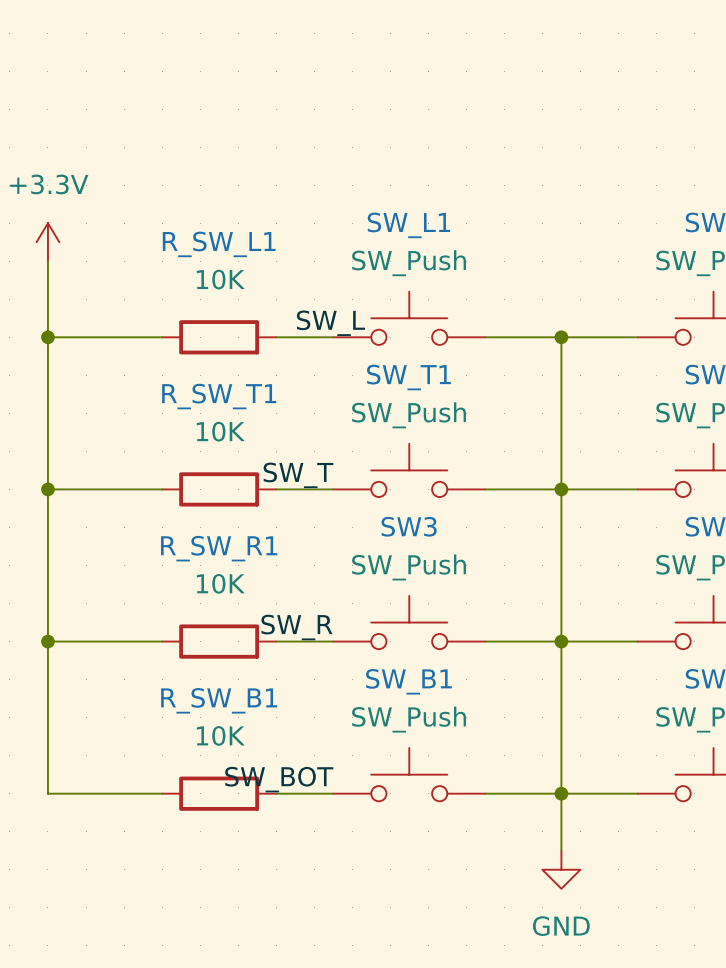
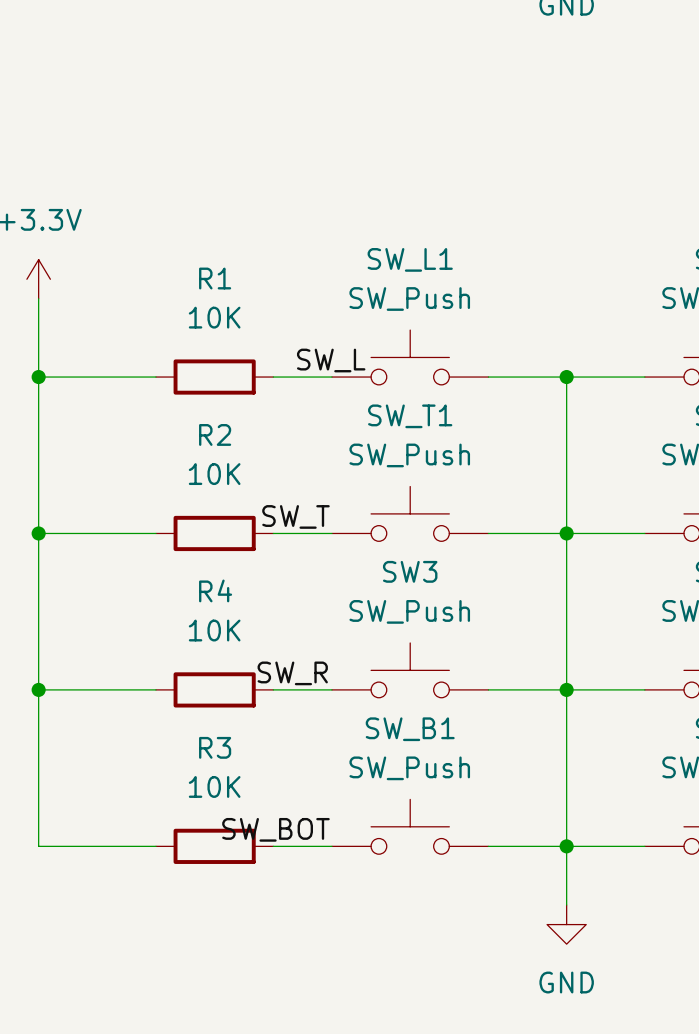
R_SW_L1 name: R_SW_L1 (219, 244) -> R1 (215, 278)
R_SW_T1 name: R_SW_T1 (219, 396) -> R2 (215, 434)
R_SW_R1 name: R_SW_R1 (219, 548) -> R4 (215, 590)
R_SW_B1 name: R_SW_B1 (219, 700) -> R3 (215, 747)

